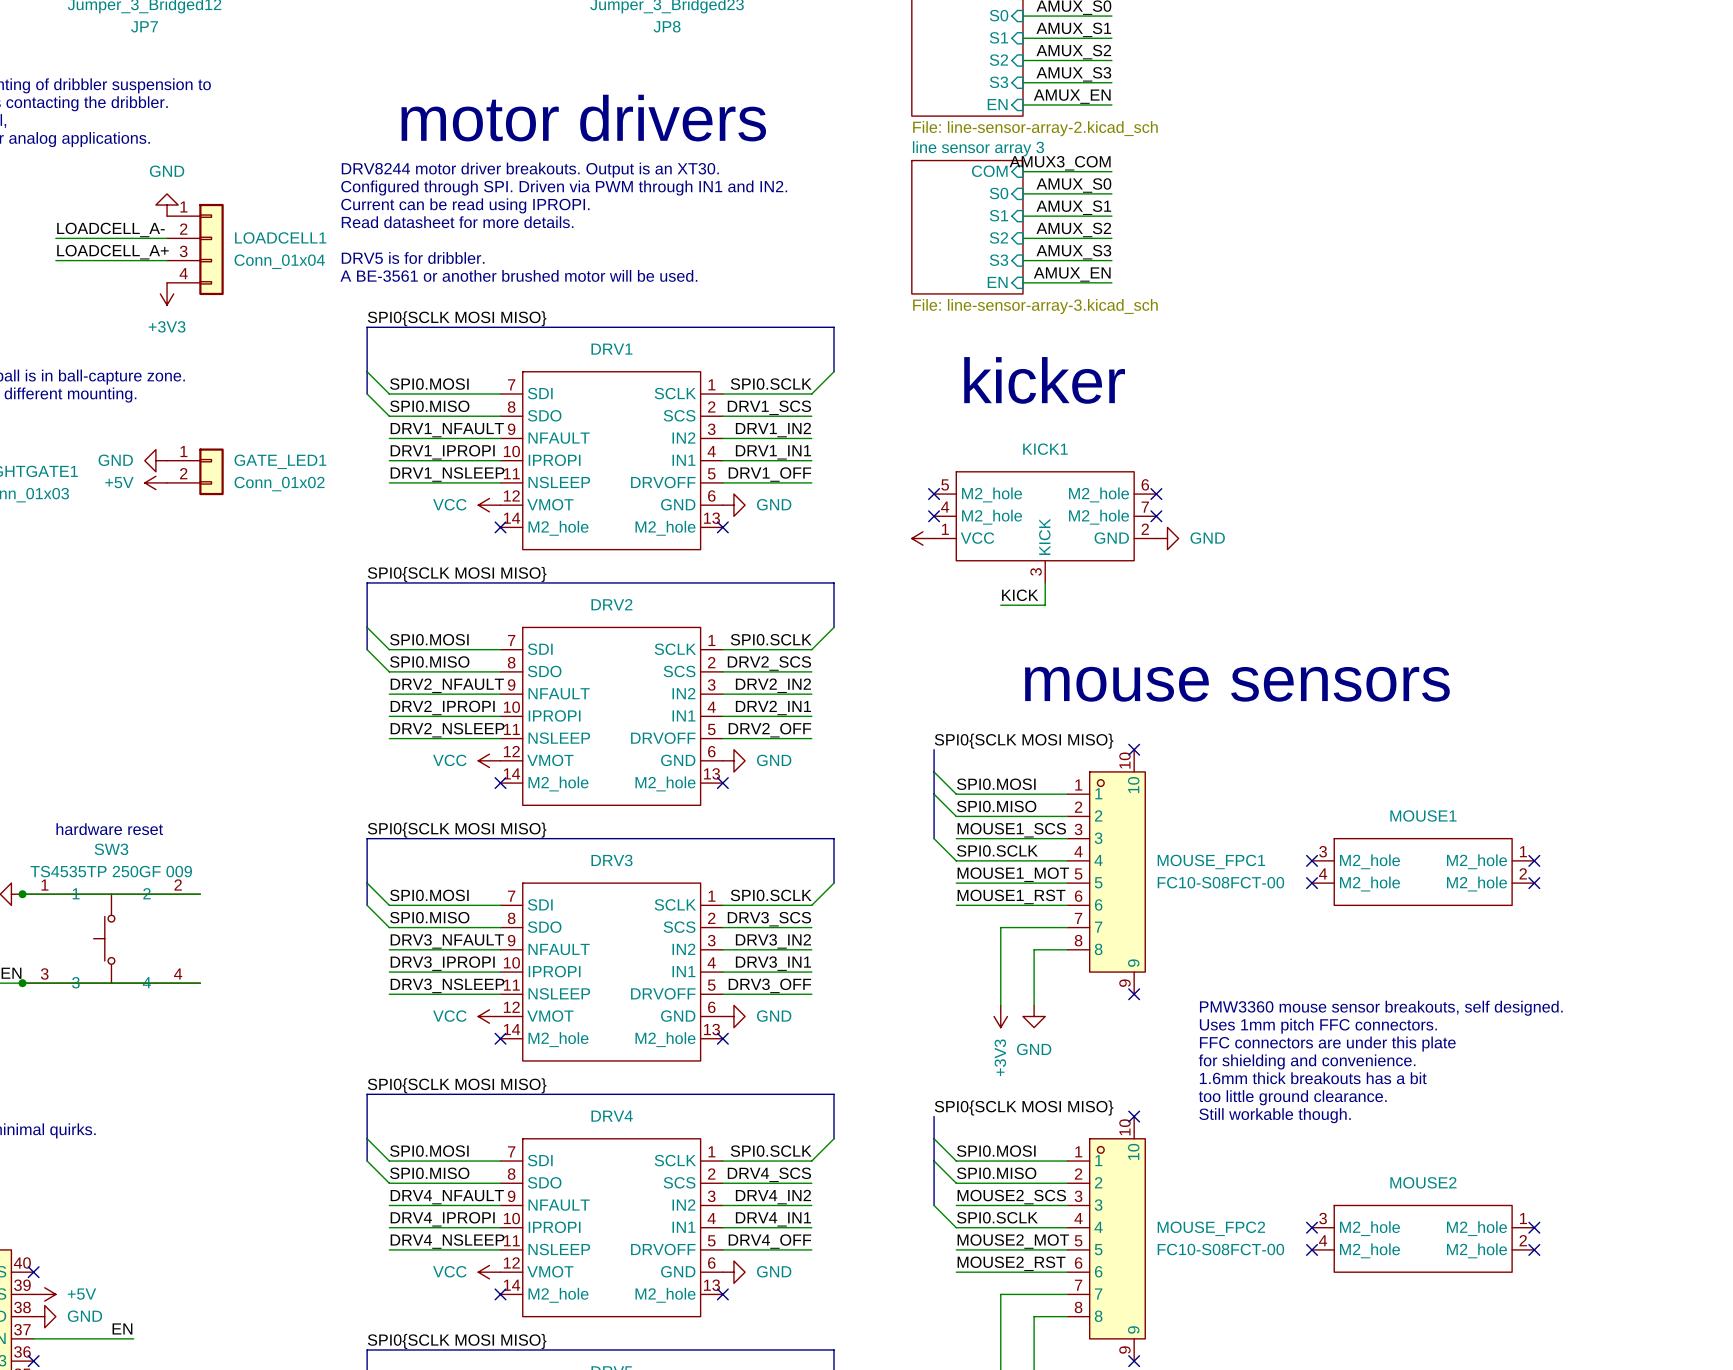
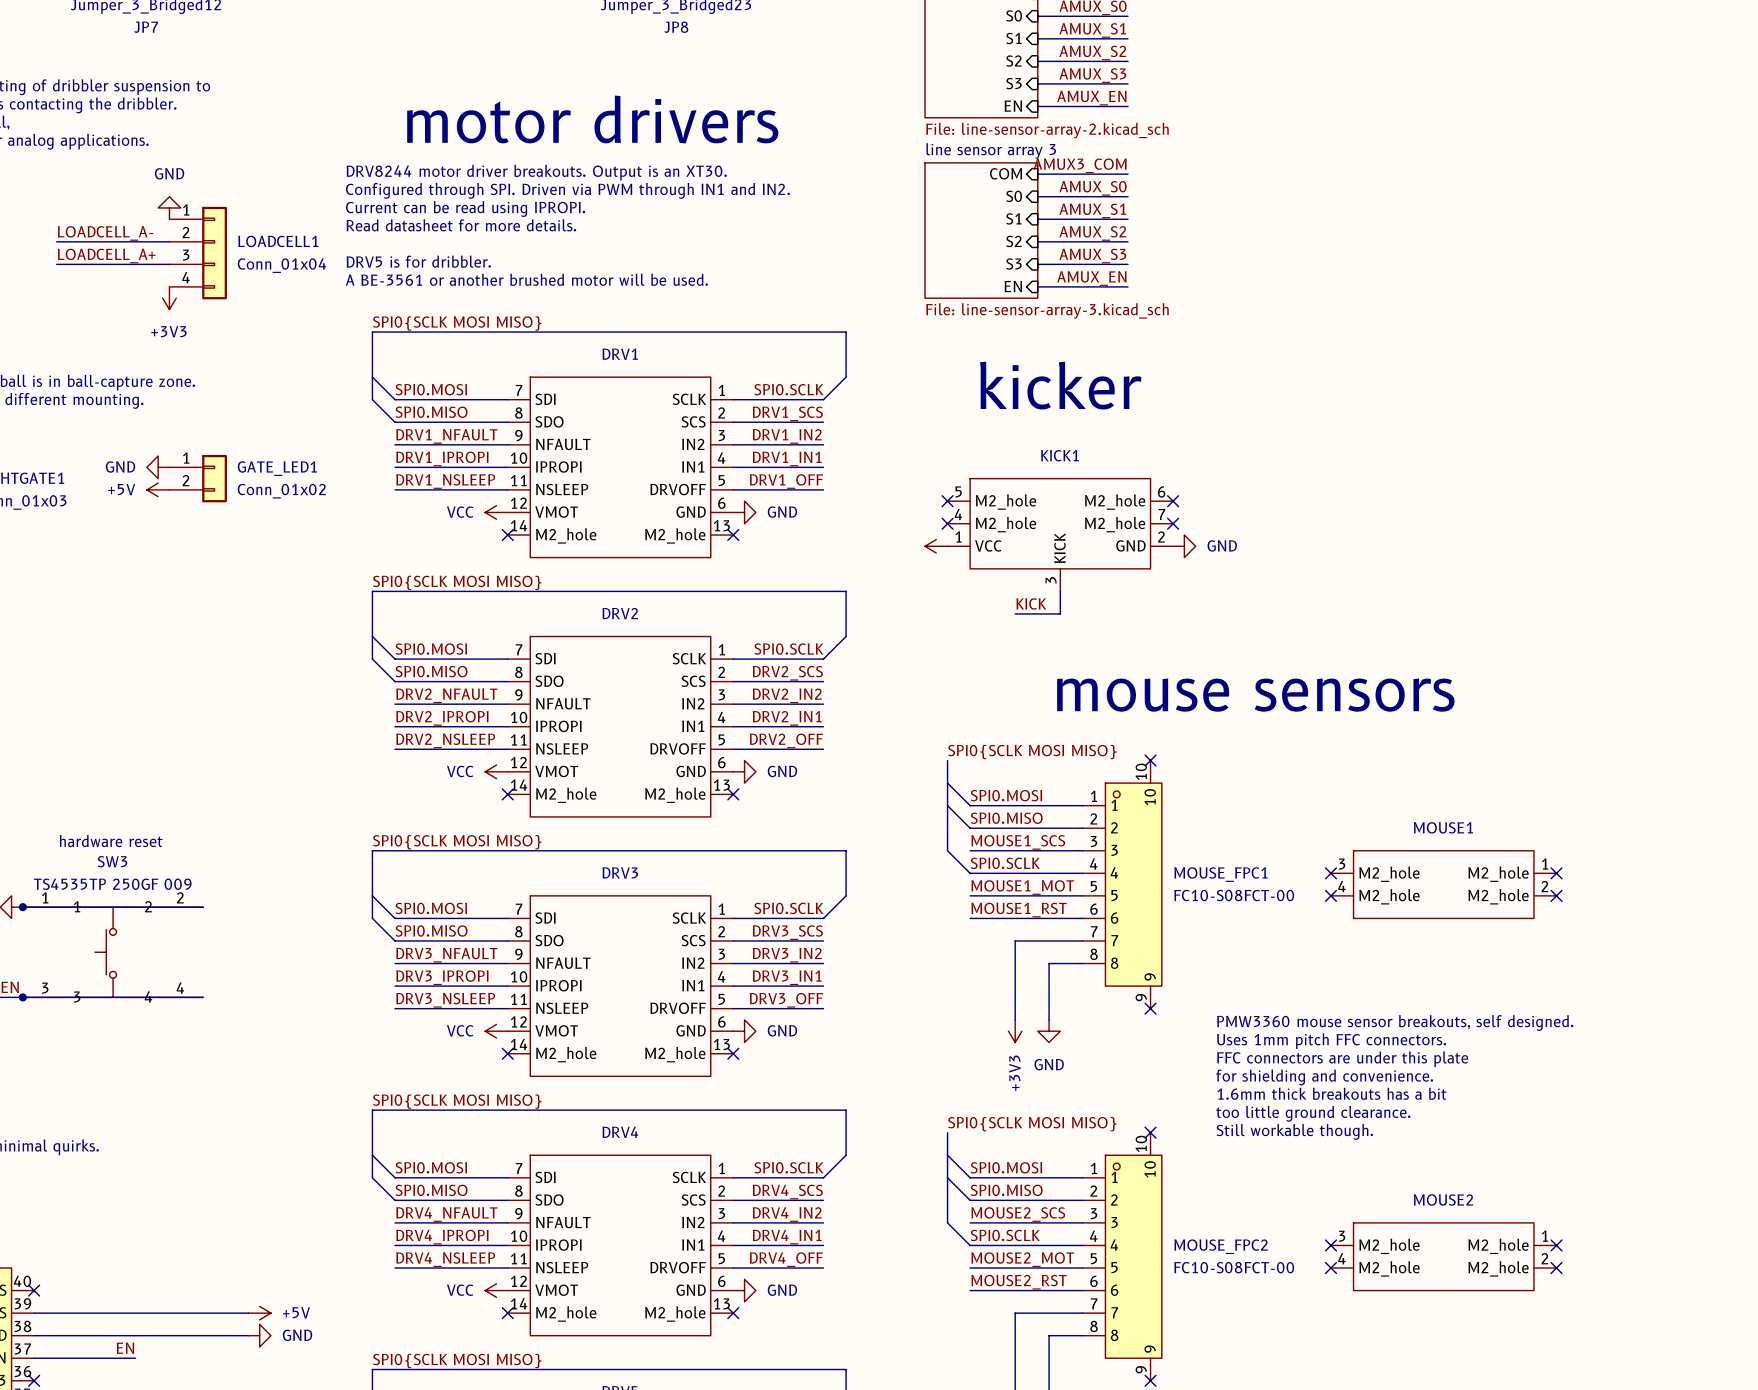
wire: none -> (34, 1313) (248, 1313)
power symbol position: +5V (44, 1294) -> +5V (259, 1313)
wire: none -> (34, 1335) (248, 1335)
power symbol position: GND (44, 1316) -> GND (259, 1335)

